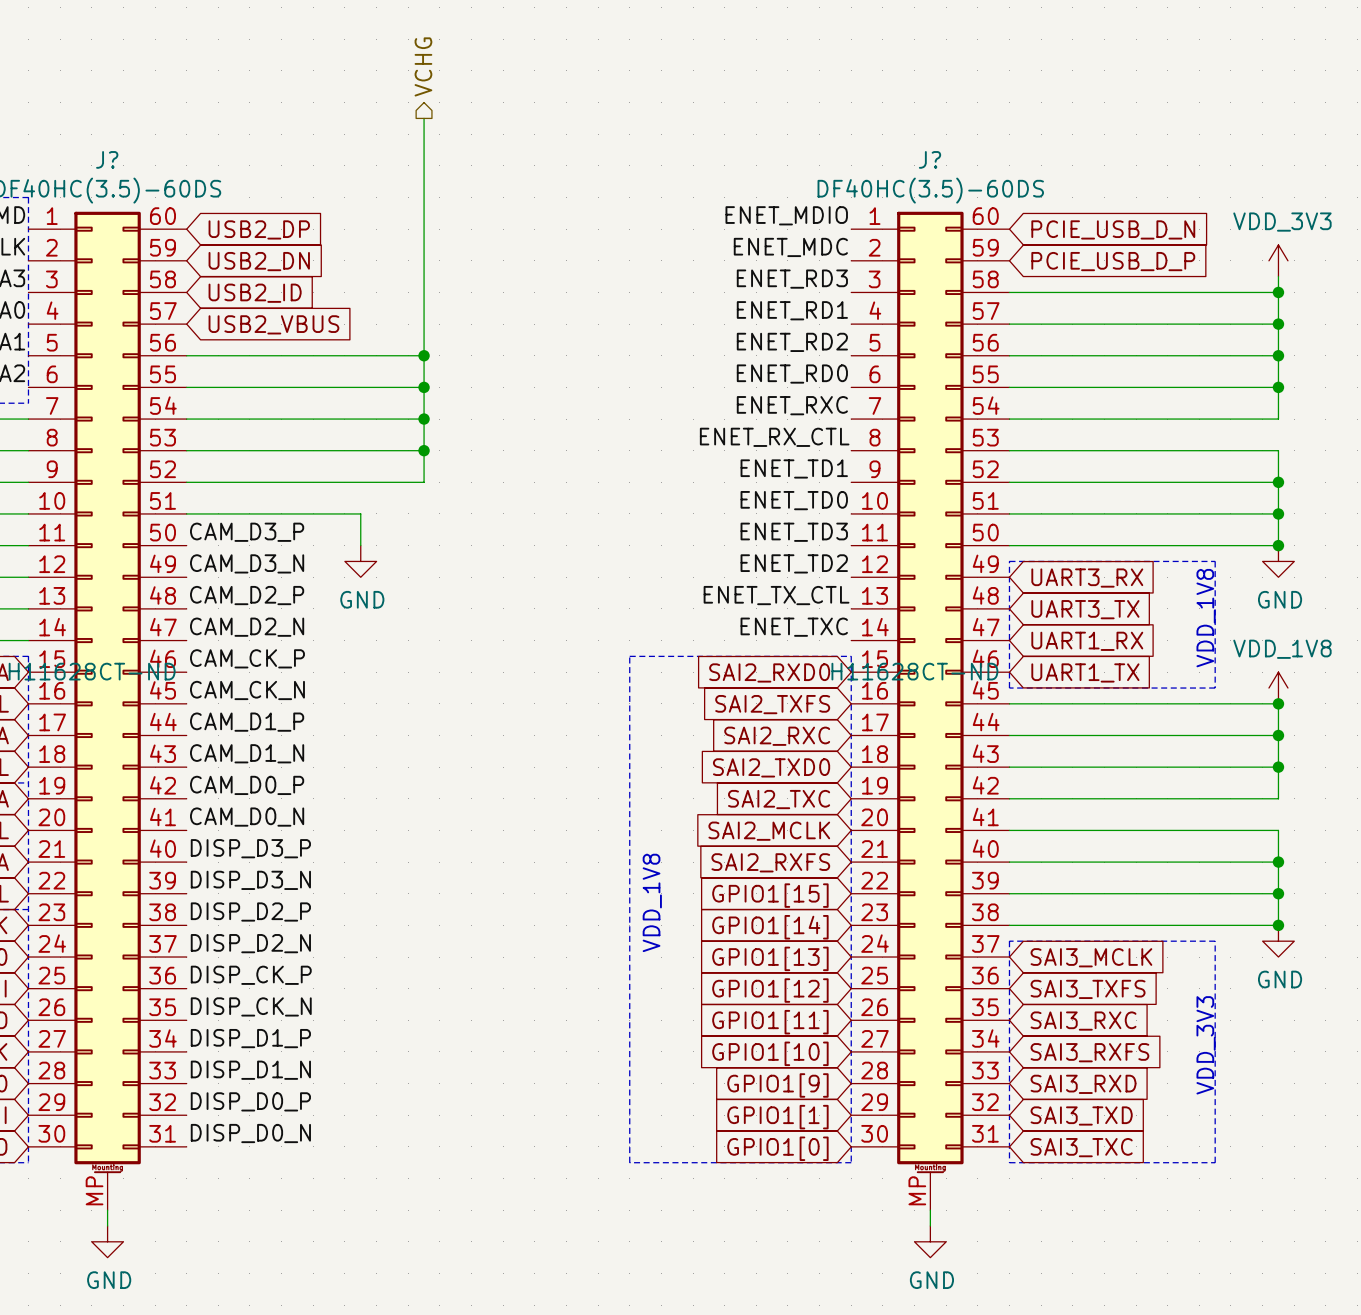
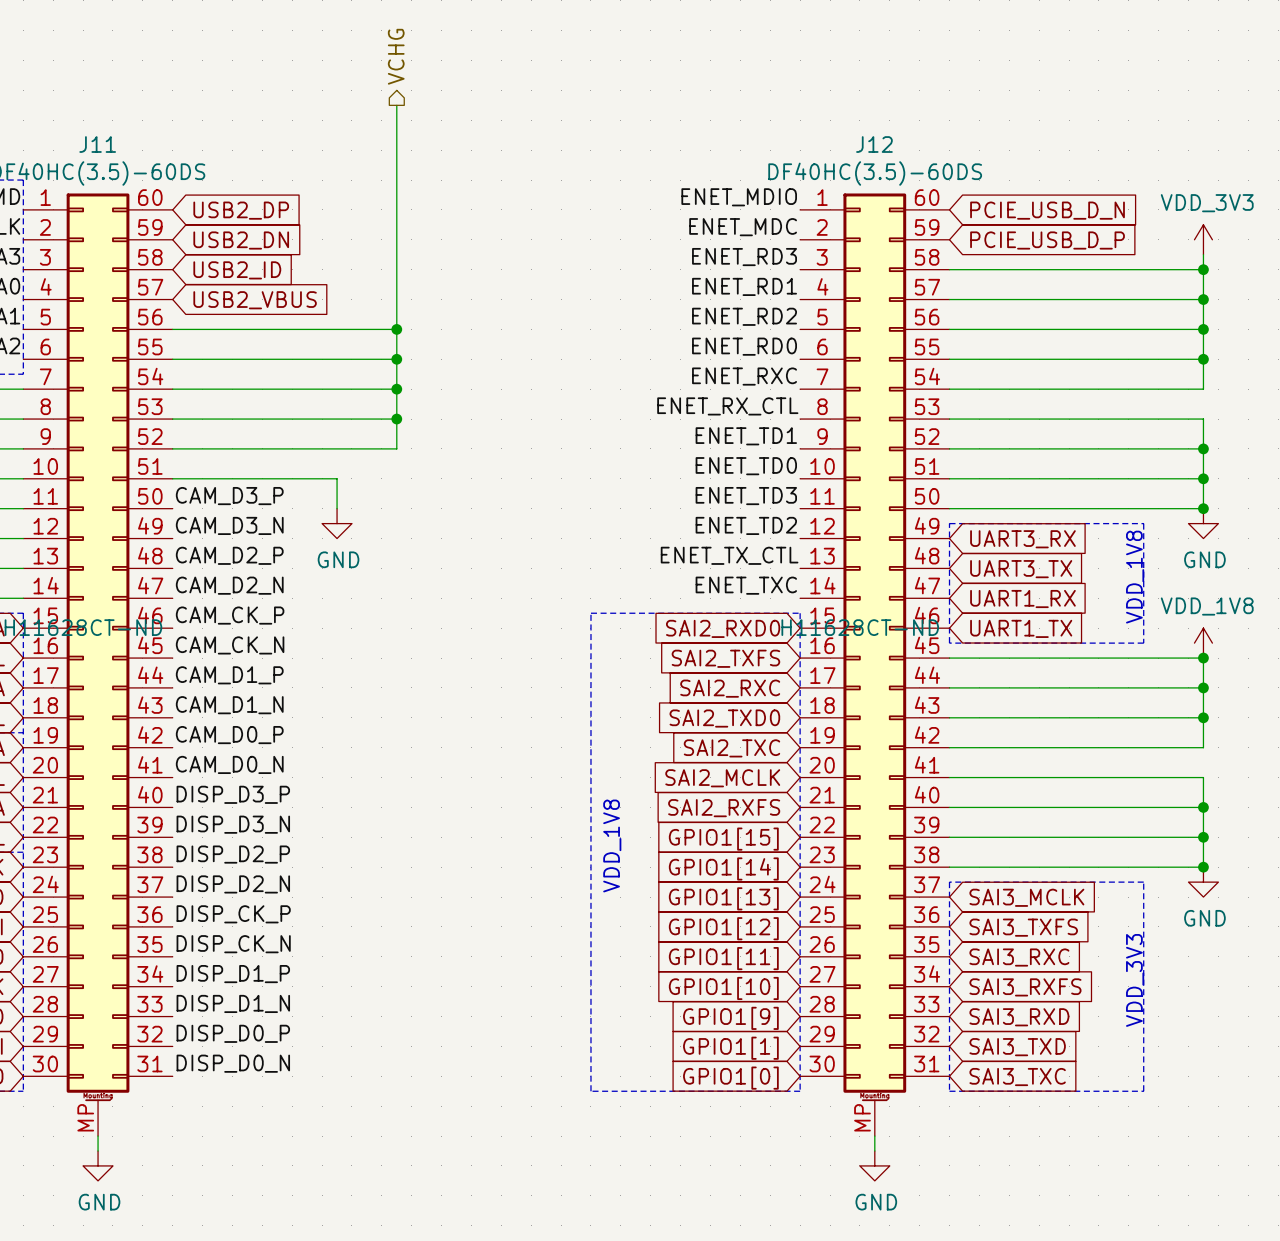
J? name: J? (107, 159) -> J11 (97, 144)
J? name: J? (929, 159) -> J12 (874, 144)

